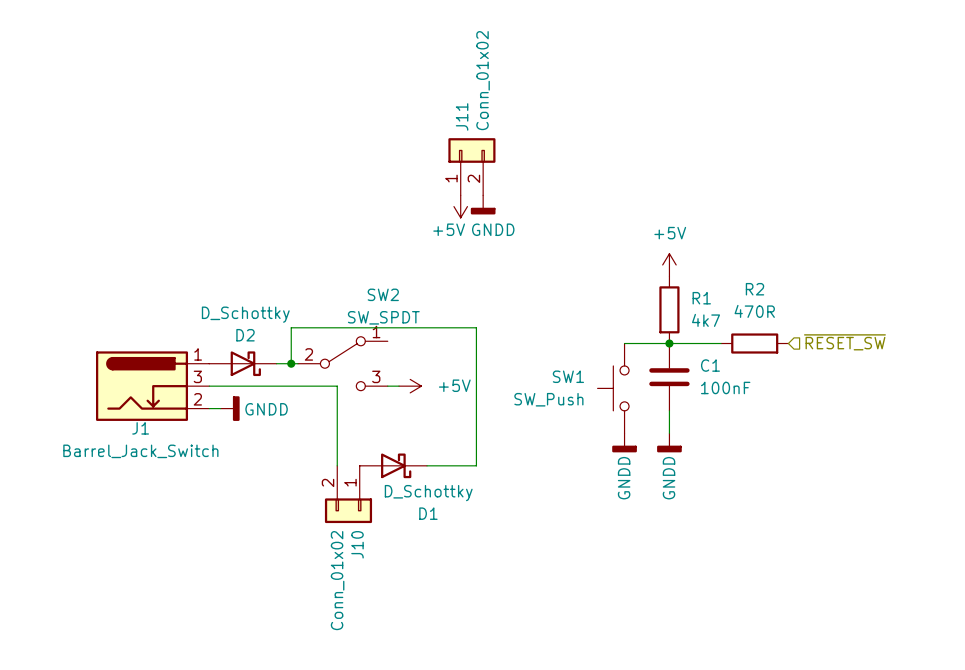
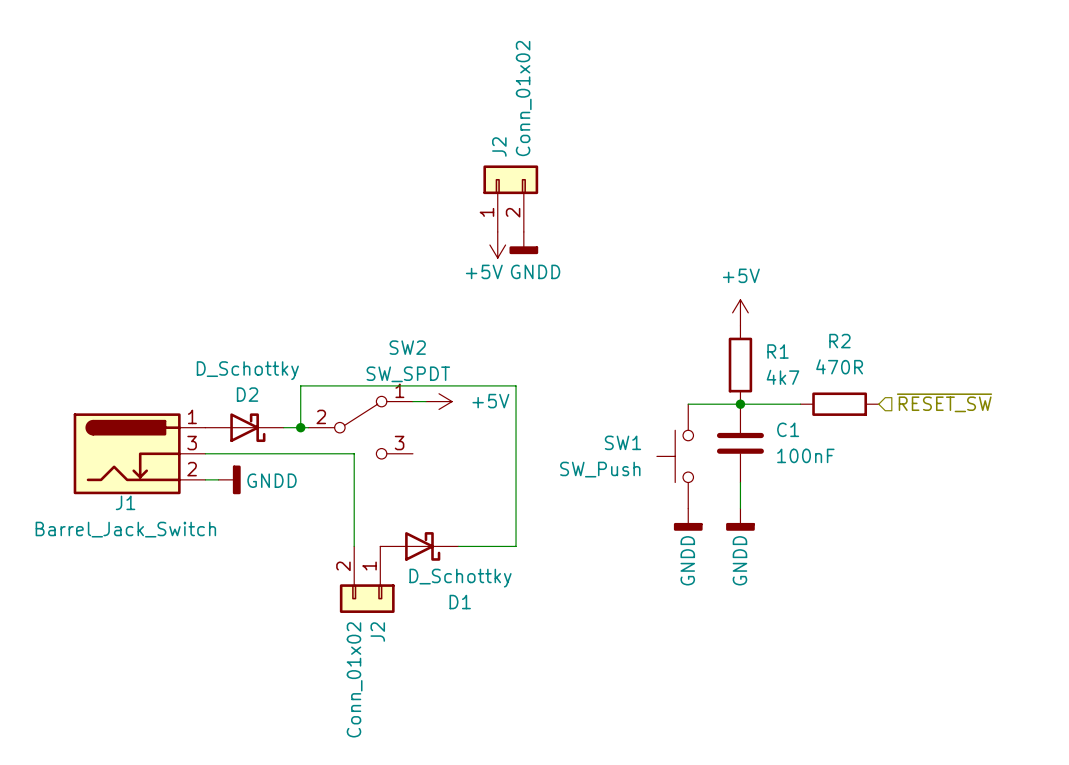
J11 name: J11 (462, 116) -> J2 (499, 146)
wire: (387, 386) (398, 386) -> (412, 401) (425, 401)
power symbol position: +5V (410, 386) -> +5V (439, 401)
J10 name: J10 (357, 544) -> J2 (377, 632)

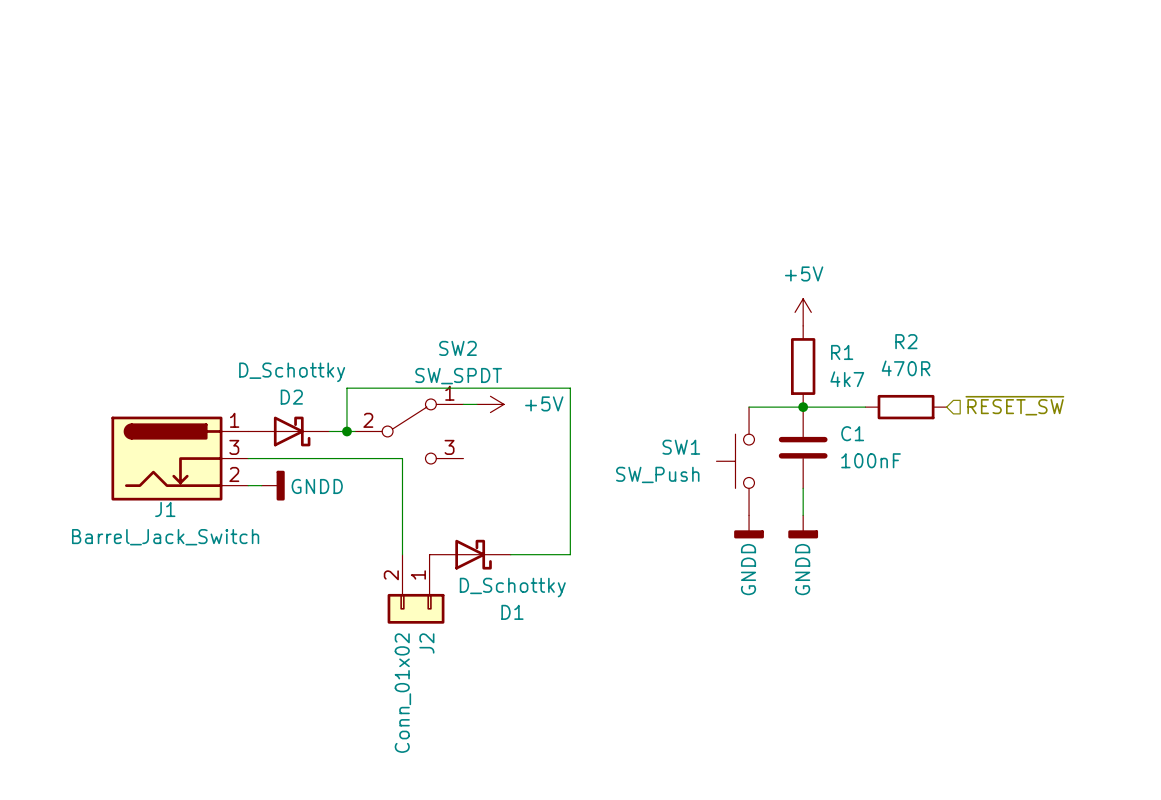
J2: Conn_01x02 (510, 198) -> none
power symbol: GNDD (523, 243) -> none
power symbol: +5V (497, 245) -> none

